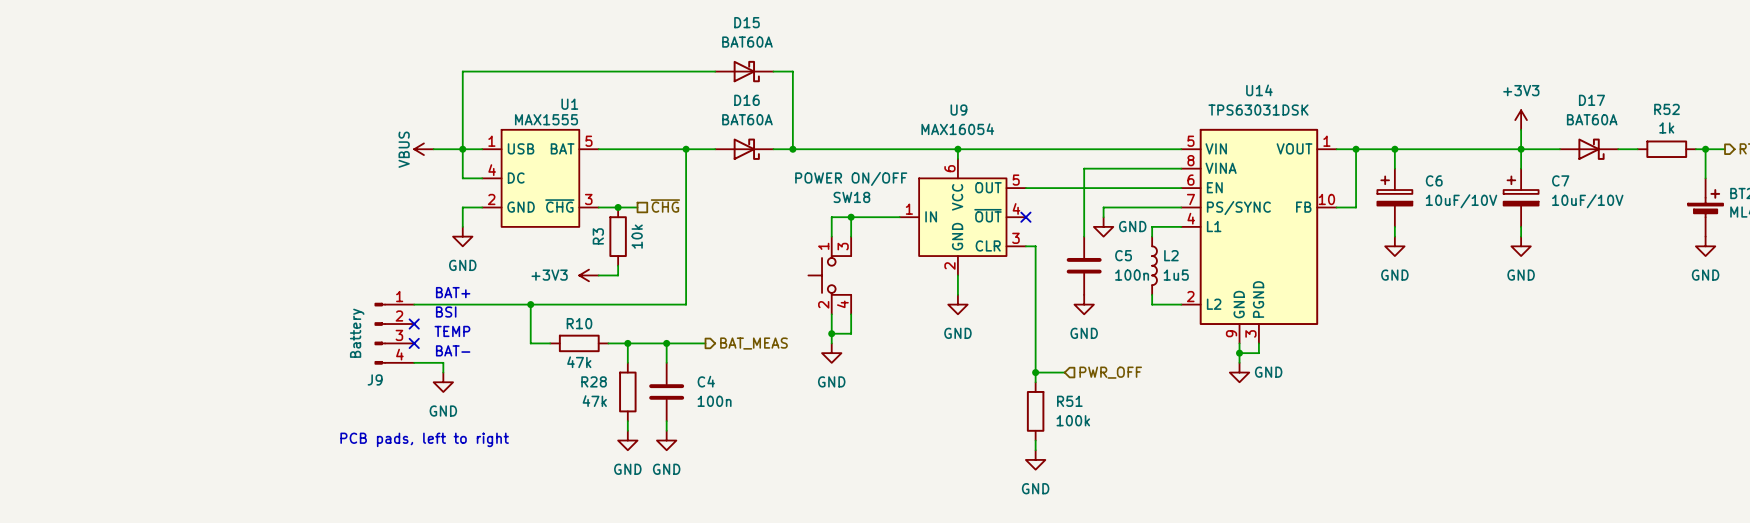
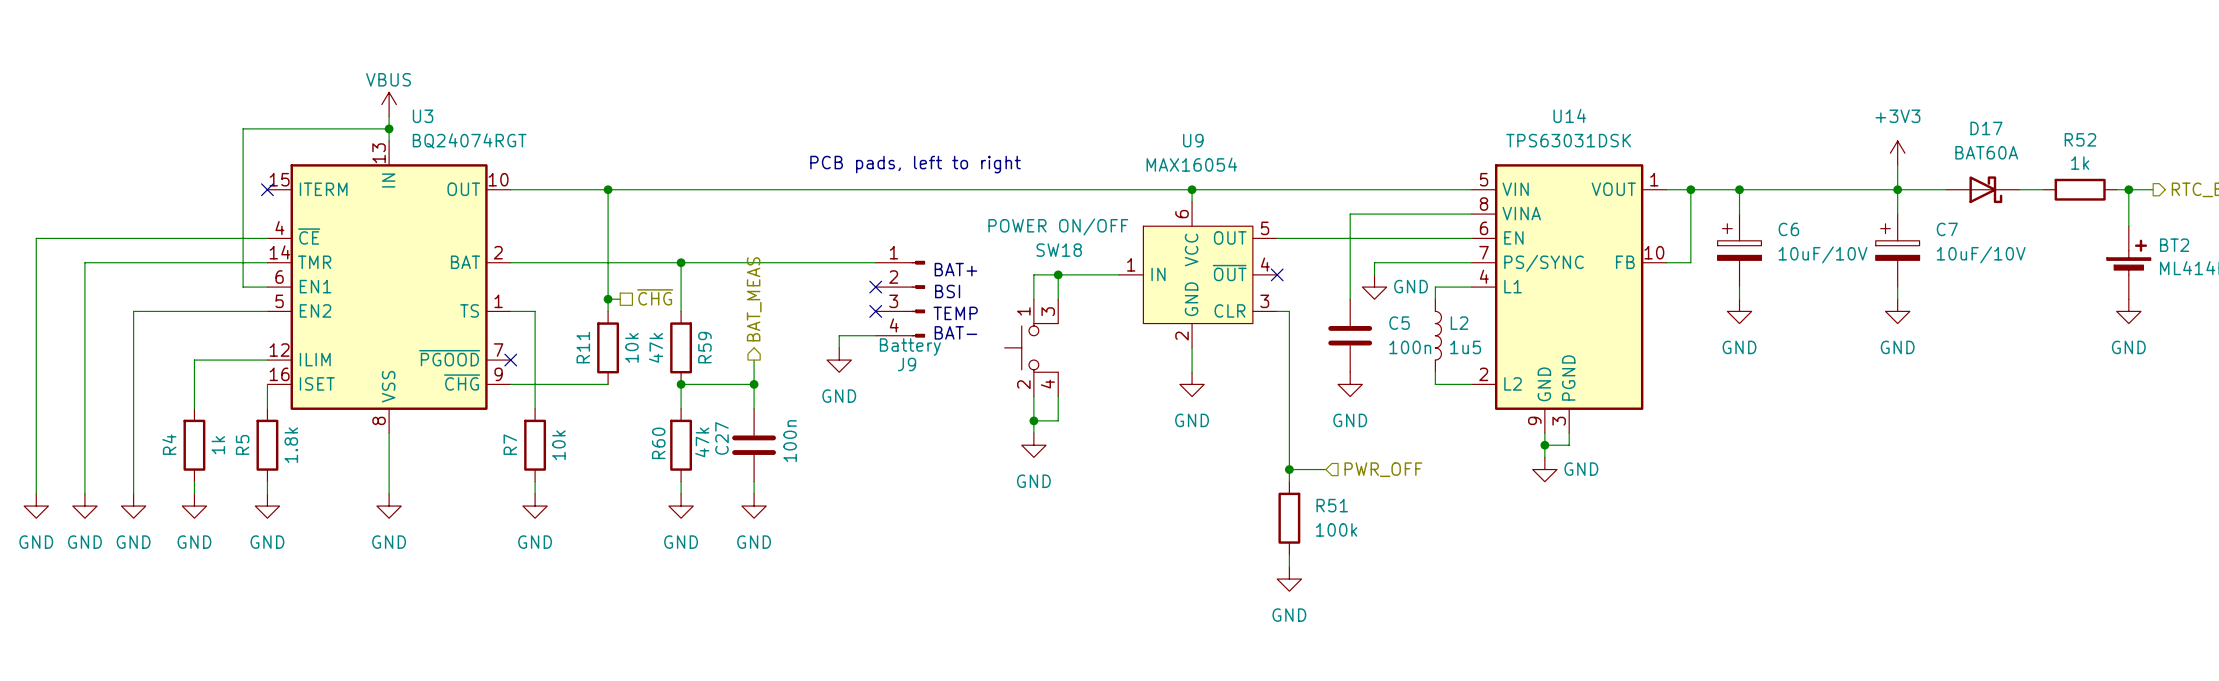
wire: (715, 71) (462, 71) (462, 178) (482, 178) -> none
D15: BAT60A (744, 71) -> none
wire: (773, 71) (792, 71) (792, 149) -> none
wire: none -> (389, 116) (389, 141)
wire: none -> (389, 128) (243, 128) (243, 287) (267, 287)
junction: none -> (389, 128)
text: none -> PCB pads, left to right (915, 164)
no-connect mark: none -> (267, 189)
power symbol rotation: 0° (423, 149) -> 90° clockwise (389, 104)
power symbol position: VBUS (423, 149) -> VBUS (389, 104)
junction position: (462, 149) -> (608, 189)
wire: none -> (608, 189) (608, 311)
wire: (686, 149) (686, 304) (608, 304) -> none
junction: (686, 149) -> none
D16: BAT60A (744, 149) -> none
junction: (792, 149) -> none
U1: MAX1555 (540, 178) -> none
wire: none -> (267, 238) (36, 238) (36, 493)
hierarchical label position: ~{CHG} (665, 206) -> ~{CHG} (655, 297)
wire: none -> (267, 262) (84, 262) (84, 493)
wire: (462, 207) (462, 226) -> (571, 262) (510, 262)
wire: none -> (681, 262) (681, 311)
junction: none -> (681, 262)
junction: (618, 207) -> none
wire: none -> (790, 262) (875, 262)
text: none -> BAT+ (955, 269)
U3: none -> BQ24074RGT (389, 287)
no-connect mark: none -> (875, 287)
text: none -> BSI (947, 291)
power symbol: GND (462, 236) -> none
wire: none -> (608, 299) (620, 299)
junction: none -> (608, 299)
R3: 10k (618, 236) -> none
wire: none -> (267, 311) (133, 311) (133, 493)
wire: none -> (510, 311) (535, 311) (535, 408)
no-connect mark: none -> (875, 311)
text: none -> TEMP (955, 313)
text: none -> BAT- (955, 332)
wire: (618, 265) (618, 275) (598, 275) -> none
wire: none -> (875, 335) (839, 335) (839, 347)
R11: none -> 10k (608, 347)
R59: none -> 47k (681, 347)
power symbol: +3V3 (588, 275) -> none
wire: none -> (267, 360) (194, 360) (194, 408)
no-connect mark: none -> (510, 360)
wire: none -> (754, 360) (754, 408)
power symbol: none -> GND (839, 360)
text: BAT+ (453, 292) -> none
wire: none -> (267, 384) (267, 408)
wire: (491, 304) (550, 304) -> (681, 408) (681, 384)
wire: (530, 304) (530, 343) (550, 343) -> none
junction position: (530, 304) -> (681, 384)
junction: none -> (754, 384)
text: BSI (446, 312) -> none
no-connect mark: (414, 324) -> none
text: TEMP (452, 331) -> none
J9 value position: Battery (357, 333) -> Battery (910, 347)
J9 flip: as is (380, 333) -> left-right (918, 299)
J9 position: (394, 333) -> (900, 299)
wire: none -> (389, 433) (389, 493)
no-connect mark: (414, 343) -> none
R10: 47k (579, 343) -> none
wire: (608, 343) (705, 343) -> none
wire: (627, 343) (627, 362) -> none
junction: (627, 343) -> none
wire: (666, 343) (666, 362) -> none
junction: (666, 343) -> none
hierarchical label rotation: 0° (753, 343) -> 90° counterclockwise (754, 299)
hierarchical label position: BAT_MEAS (753, 343) -> BAT_MEAS (754, 299)
text: BAT- (453, 350) -> none
R4: none -> 1k (194, 445)
R5: none -> 1.8k (267, 445)
R7: none -> 10k (535, 445)
R60: none -> 47k (681, 445)
C27: none -> 100n (754, 445)
wire: (414, 362) (443, 362) (443, 372) -> none
wire: none -> (194, 481) (194, 493)
wire: none -> (267, 481) (267, 493)
wire: none -> (535, 481) (535, 493)
power symbol position: GND (443, 382) -> GND (535, 506)
R28: 47k (627, 391) -> none
C4: 100n (666, 391) -> none
power symbol: none -> GND (36, 506)
power symbol: none -> GND (84, 506)
power symbol: none -> GND (133, 506)
power symbol: none -> GND (194, 506)
power symbol: none -> GND (267, 506)
power symbol: none -> GND (389, 506)
power symbol: none -> GND (681, 506)
power symbol: none -> GND (754, 506)
wire: (627, 421) (627, 430) -> (681, 481) (681, 493)
wire: (666, 421) (666, 430) -> (754, 481) (754, 493)
text: PCB pads, left to right (424, 439) -> none
power symbol: GND (627, 440) -> none
power symbol: GND (666, 440) -> none

